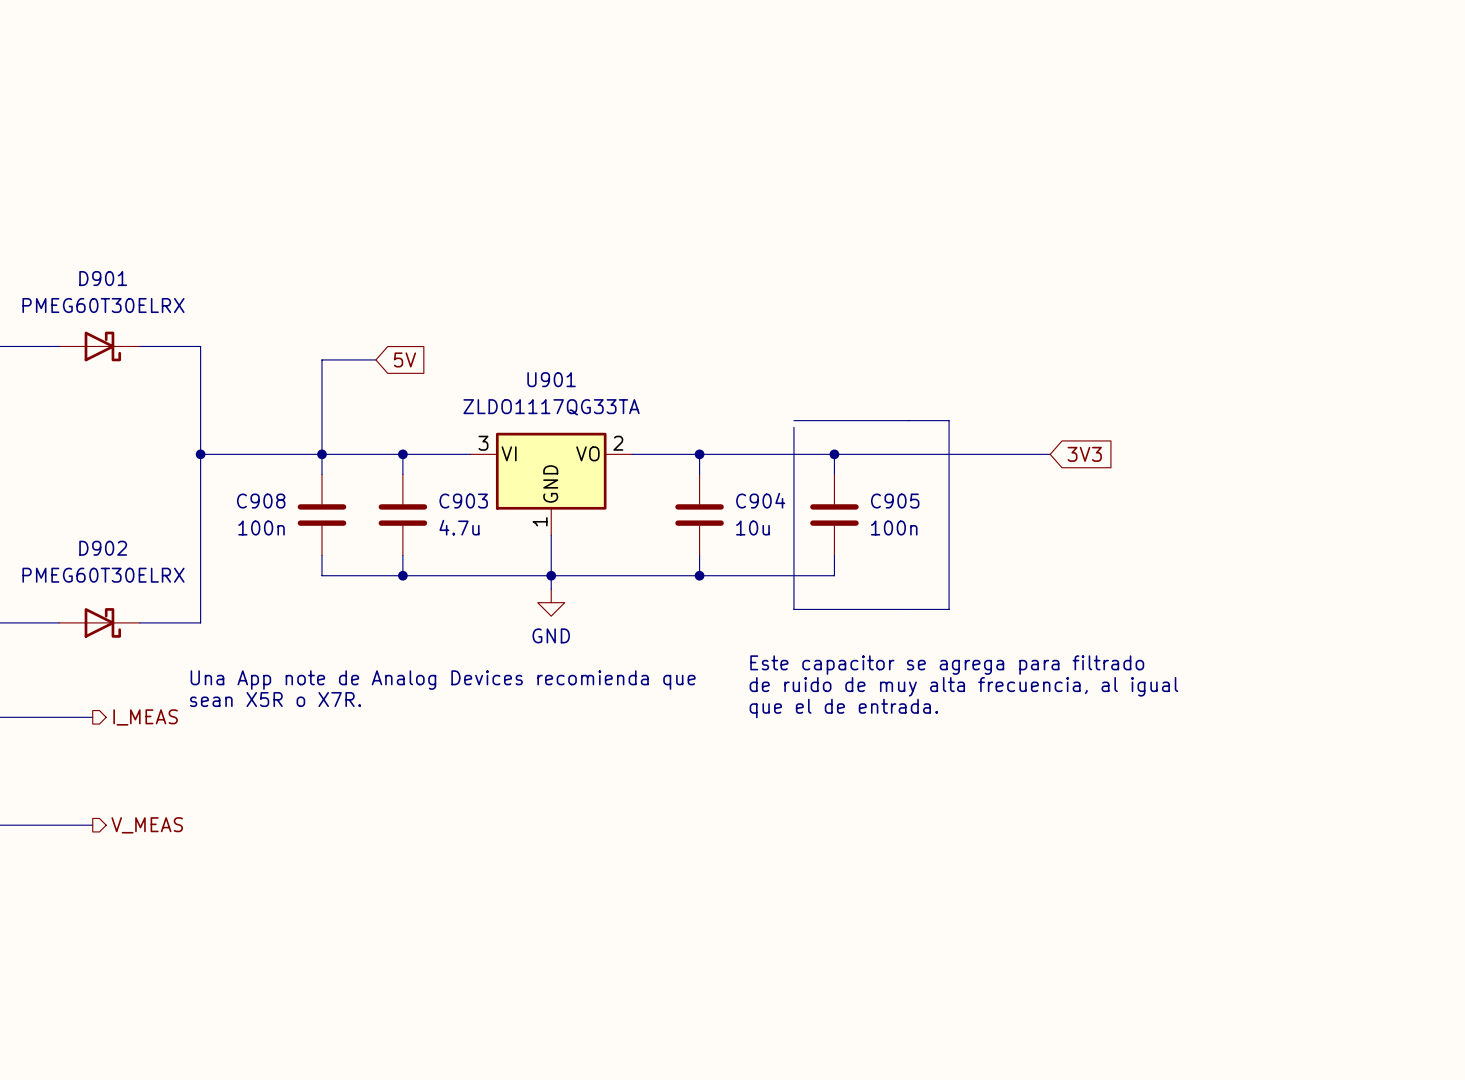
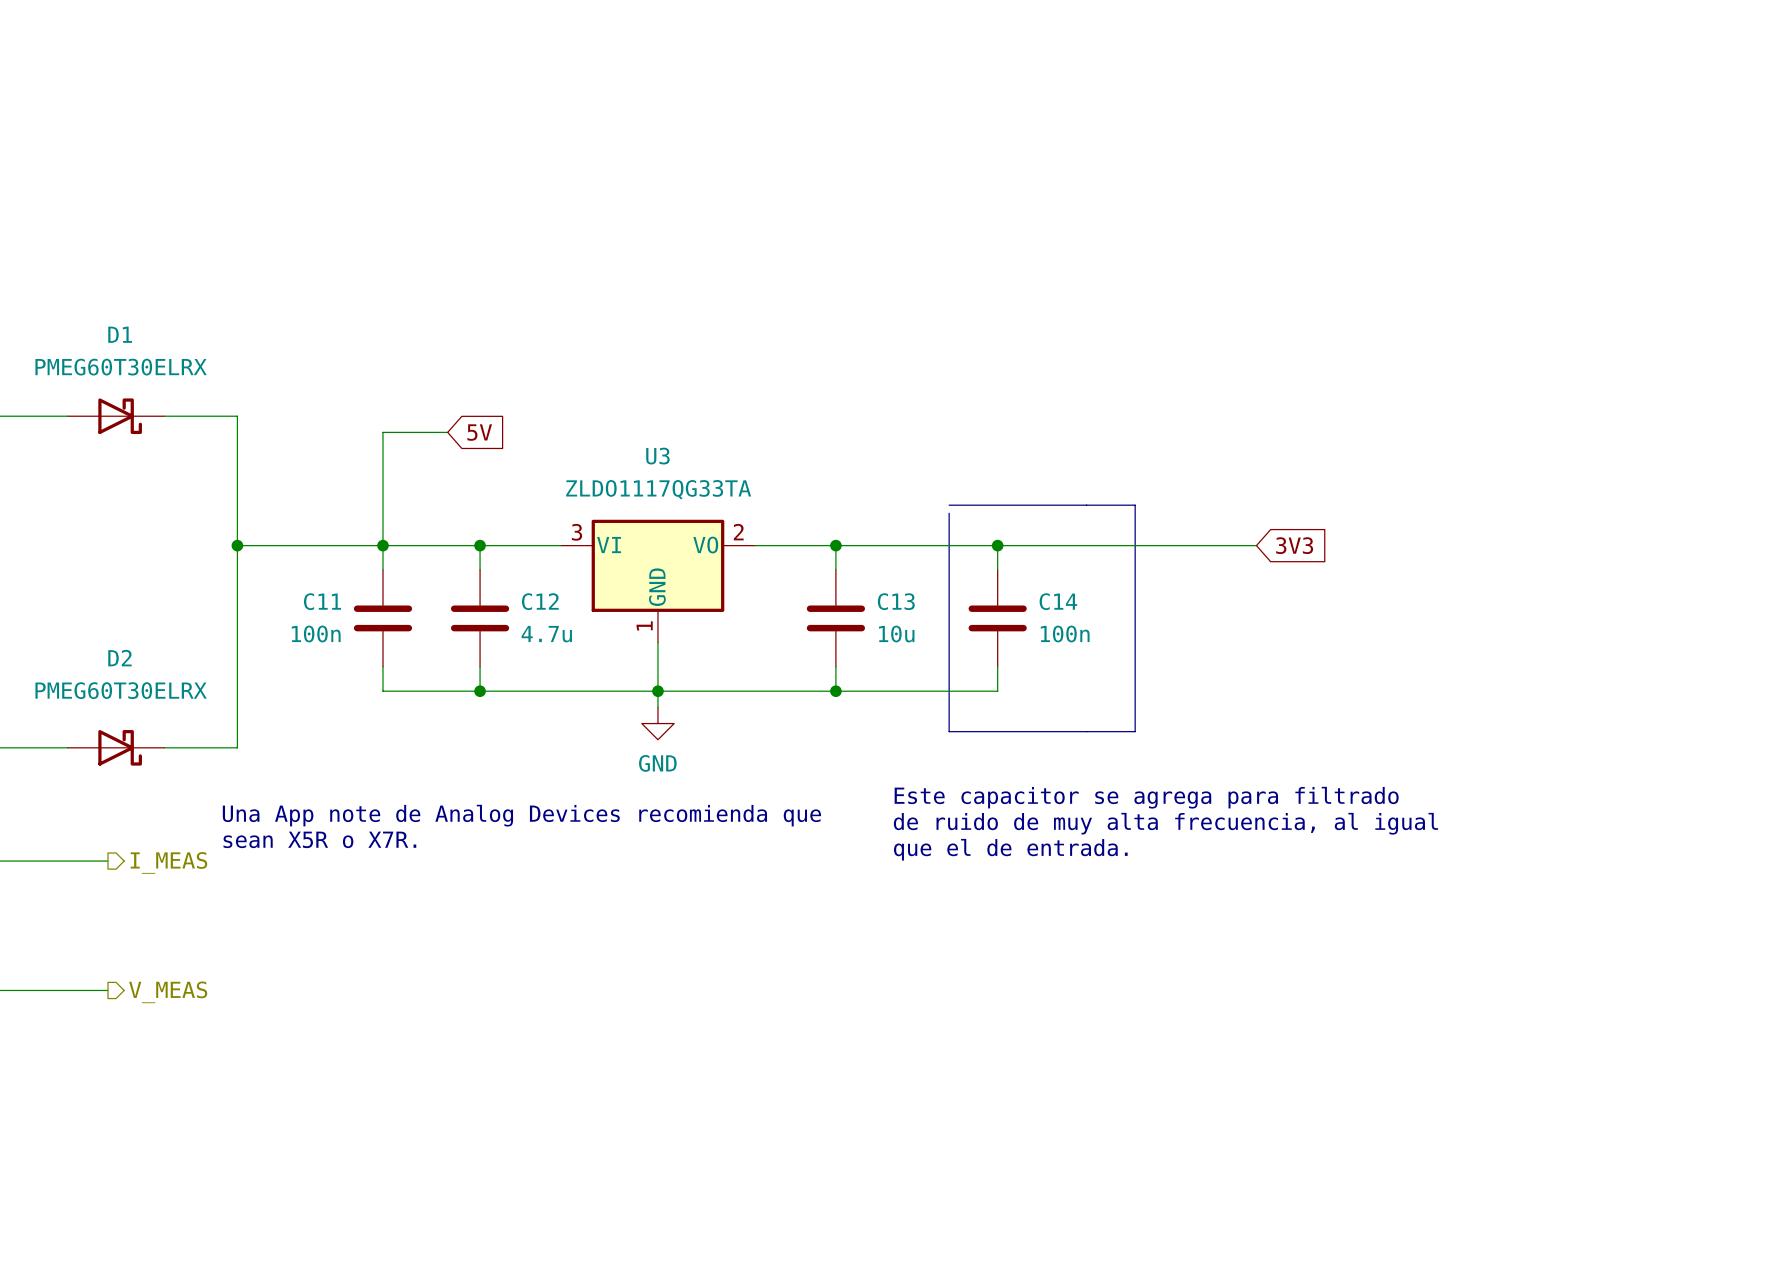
D901 name: D901 (103, 278) -> D1 (120, 334)
U901 name: U901 (551, 379) -> U3 (657, 456)
C904 name: C904 (760, 500) -> C13 (896, 601)
C908 name: C908 (261, 501) -> C11 (322, 601)
C903 name: C903 (463, 501) -> C12 (540, 601)
C905 name: C905 (895, 501) -> C14 (1058, 601)
D902 name: D902 (103, 548) -> D2 (119, 658)

